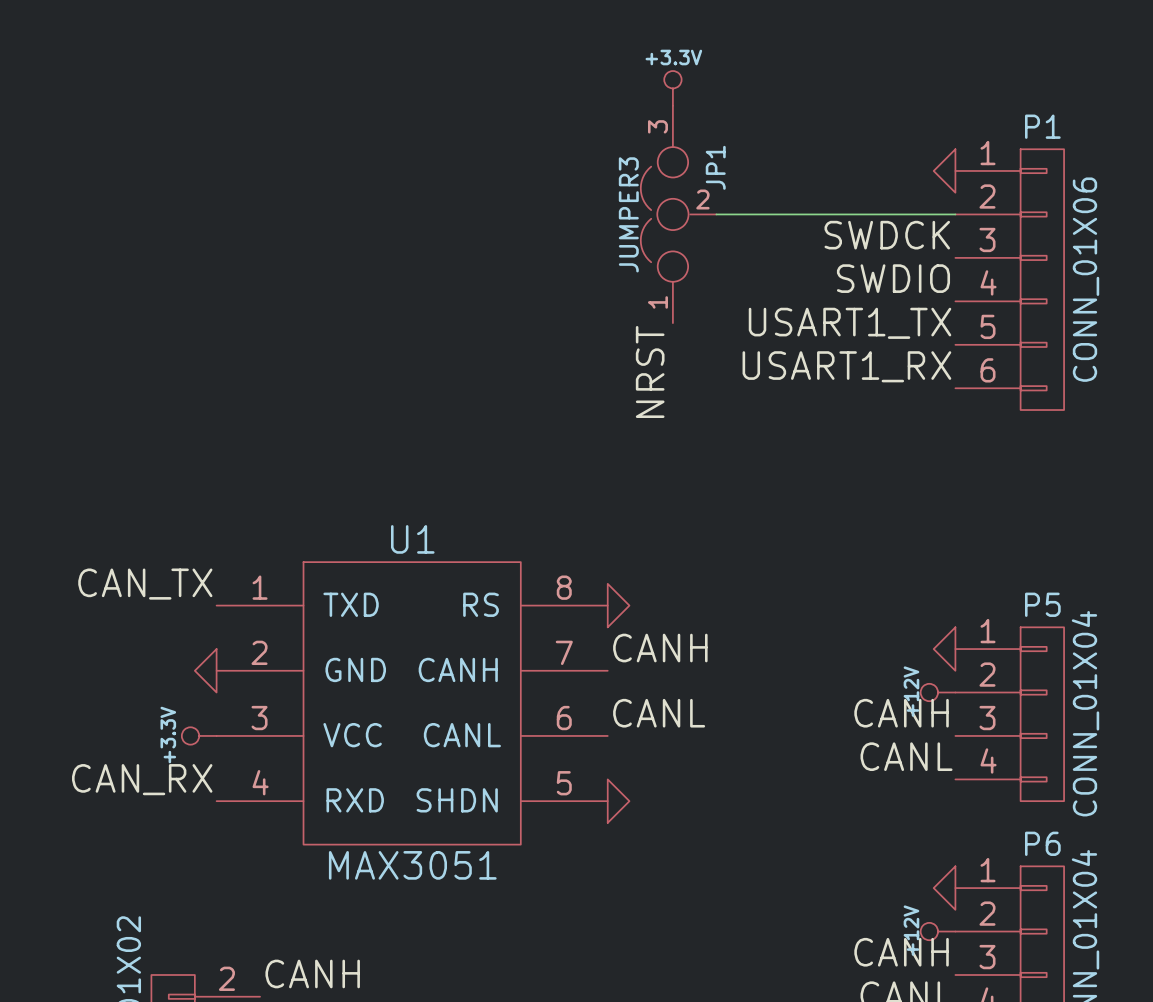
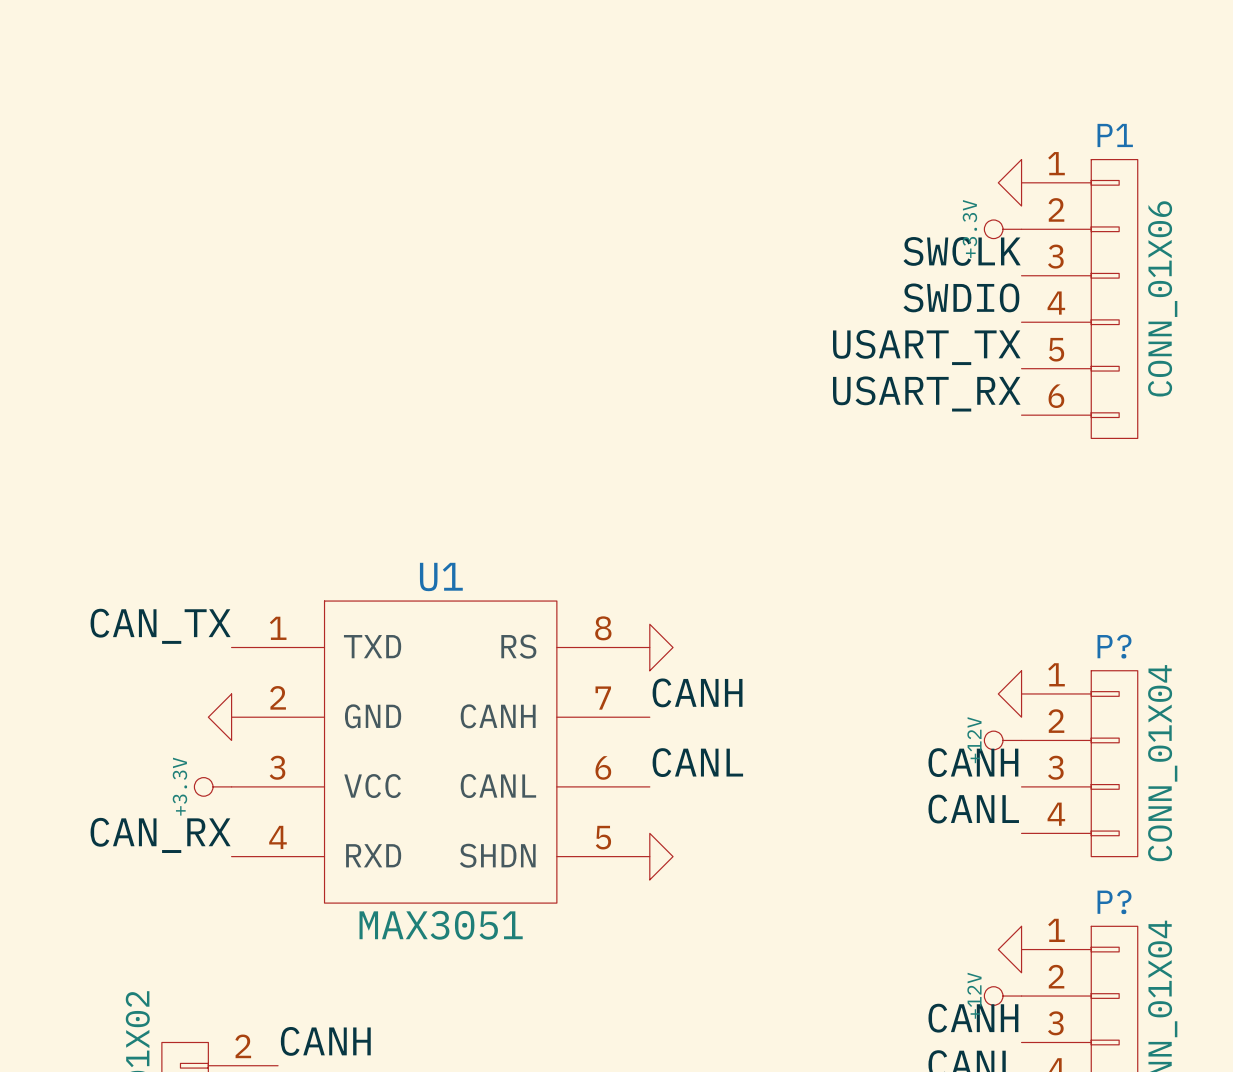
power symbol rotation: 0° (672, 88) -> 90° counterclockwise (1002, 229)
power symbol position: +3.3V (672, 88) -> +3.3V (1002, 229)
JP1: JUMPER3 (678, 214) -> none
wire: (716, 214) (955, 214) -> none
label: SWDCK (887, 235) -> SWCLK (962, 251)
label: USART1_TX (850, 323) -> USART_TX (926, 347)
label: USART1_RX (846, 366) -> USART_RX (926, 393)
label: NRST (650, 371) -> none
P5 name: P5 (1042, 604) -> P? (1114, 646)
P6 name: P6 (1042, 843) -> P? (1114, 902)

